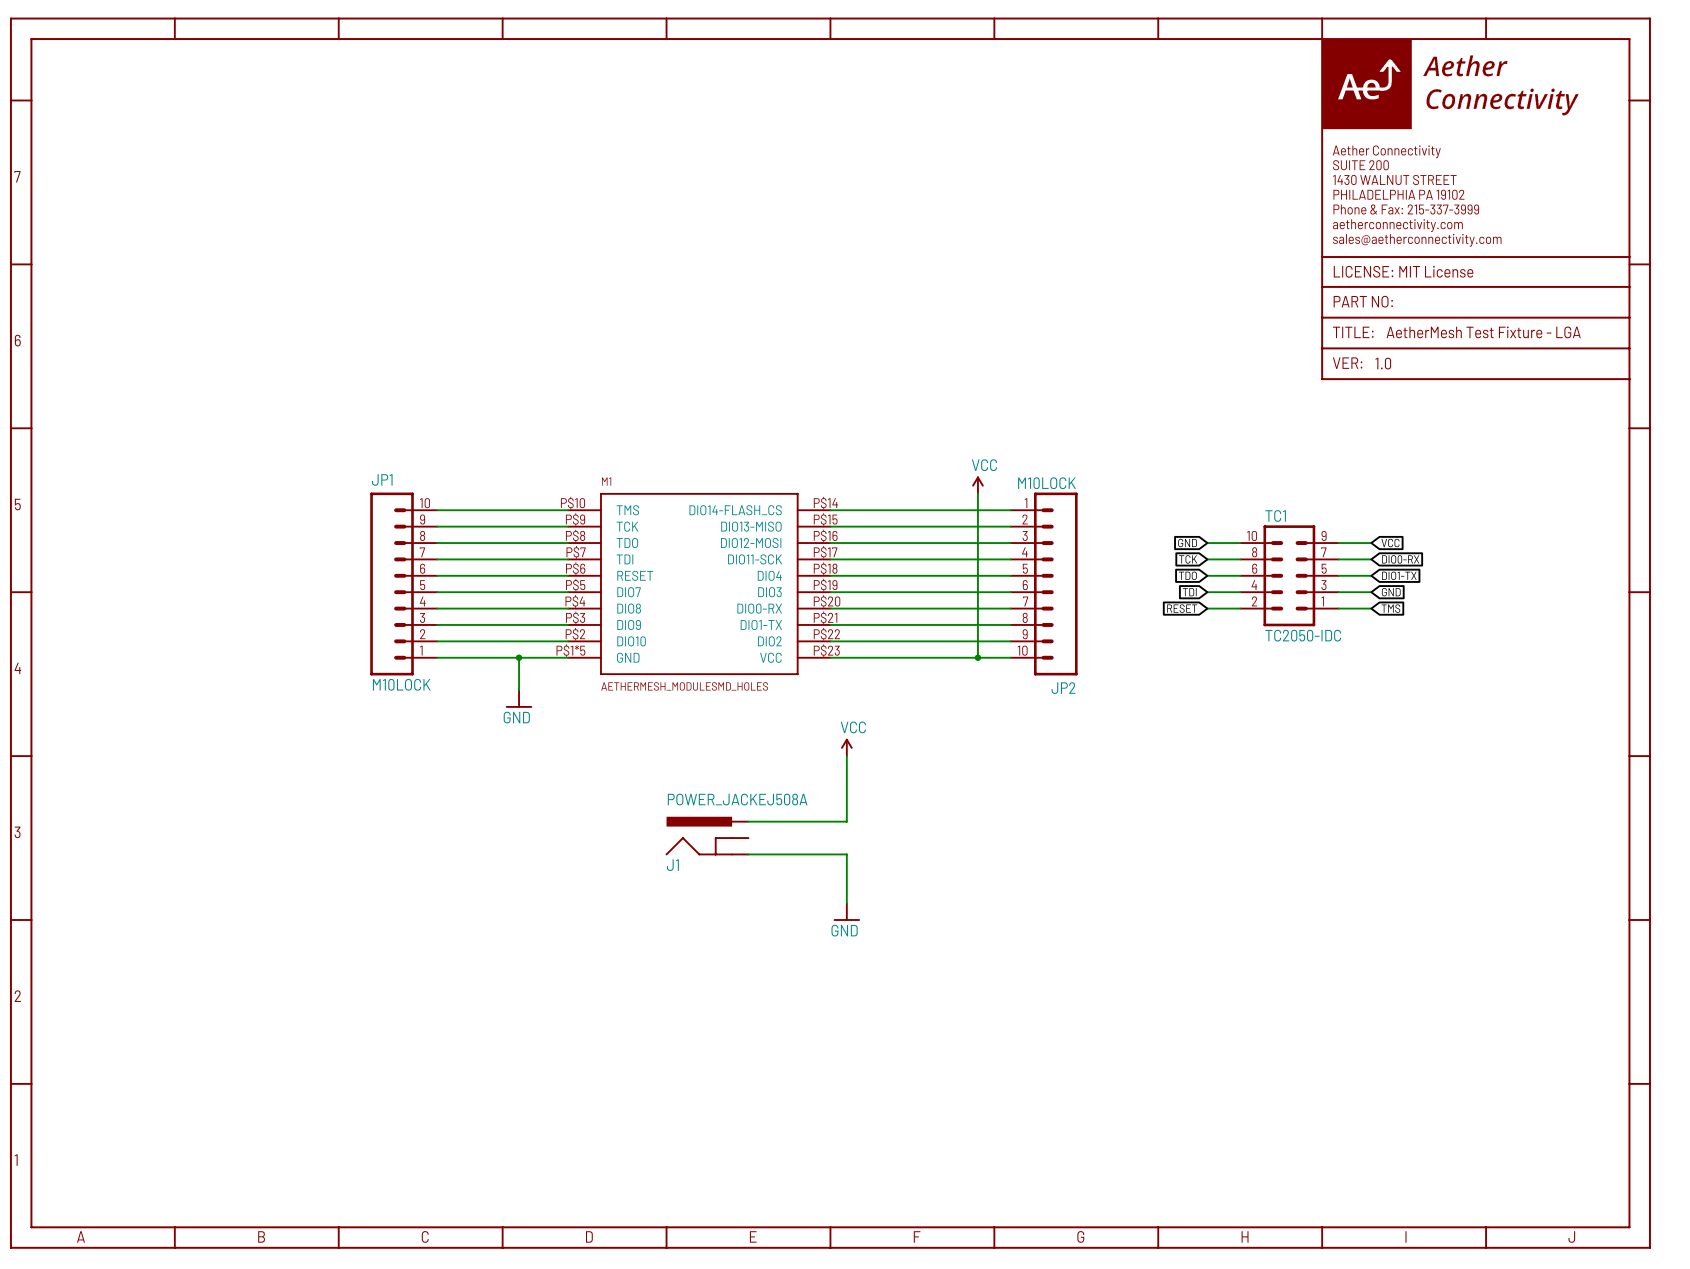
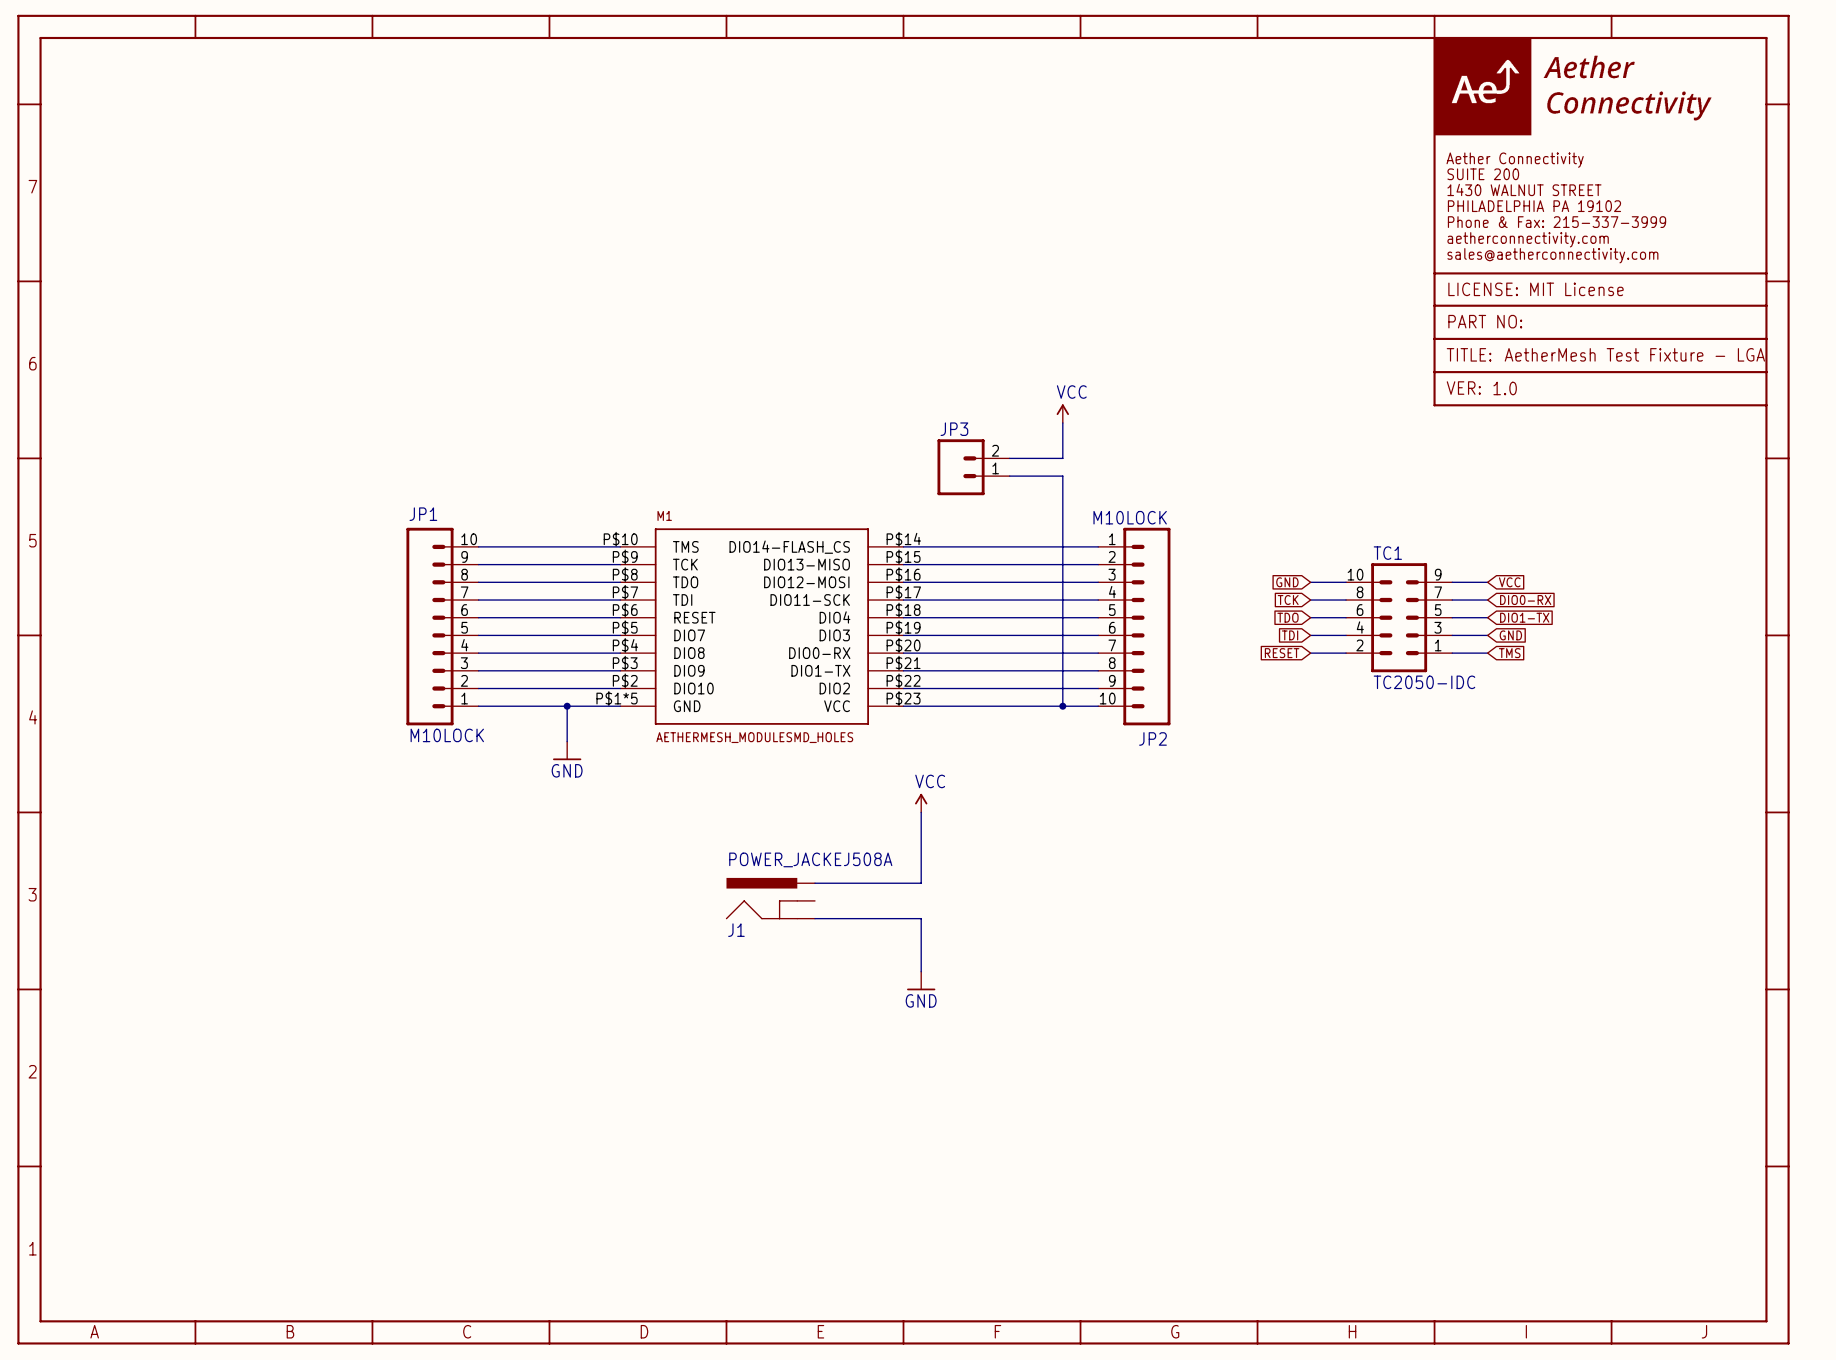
wire: none -> (1062, 422) (1062, 458) (1009, 458)
JP3: none -> (973, 467)
wire: none -> (1009, 476) (1062, 476) (1062, 529)
power symbol position: VCC (977, 485) -> VCC (1062, 413)

